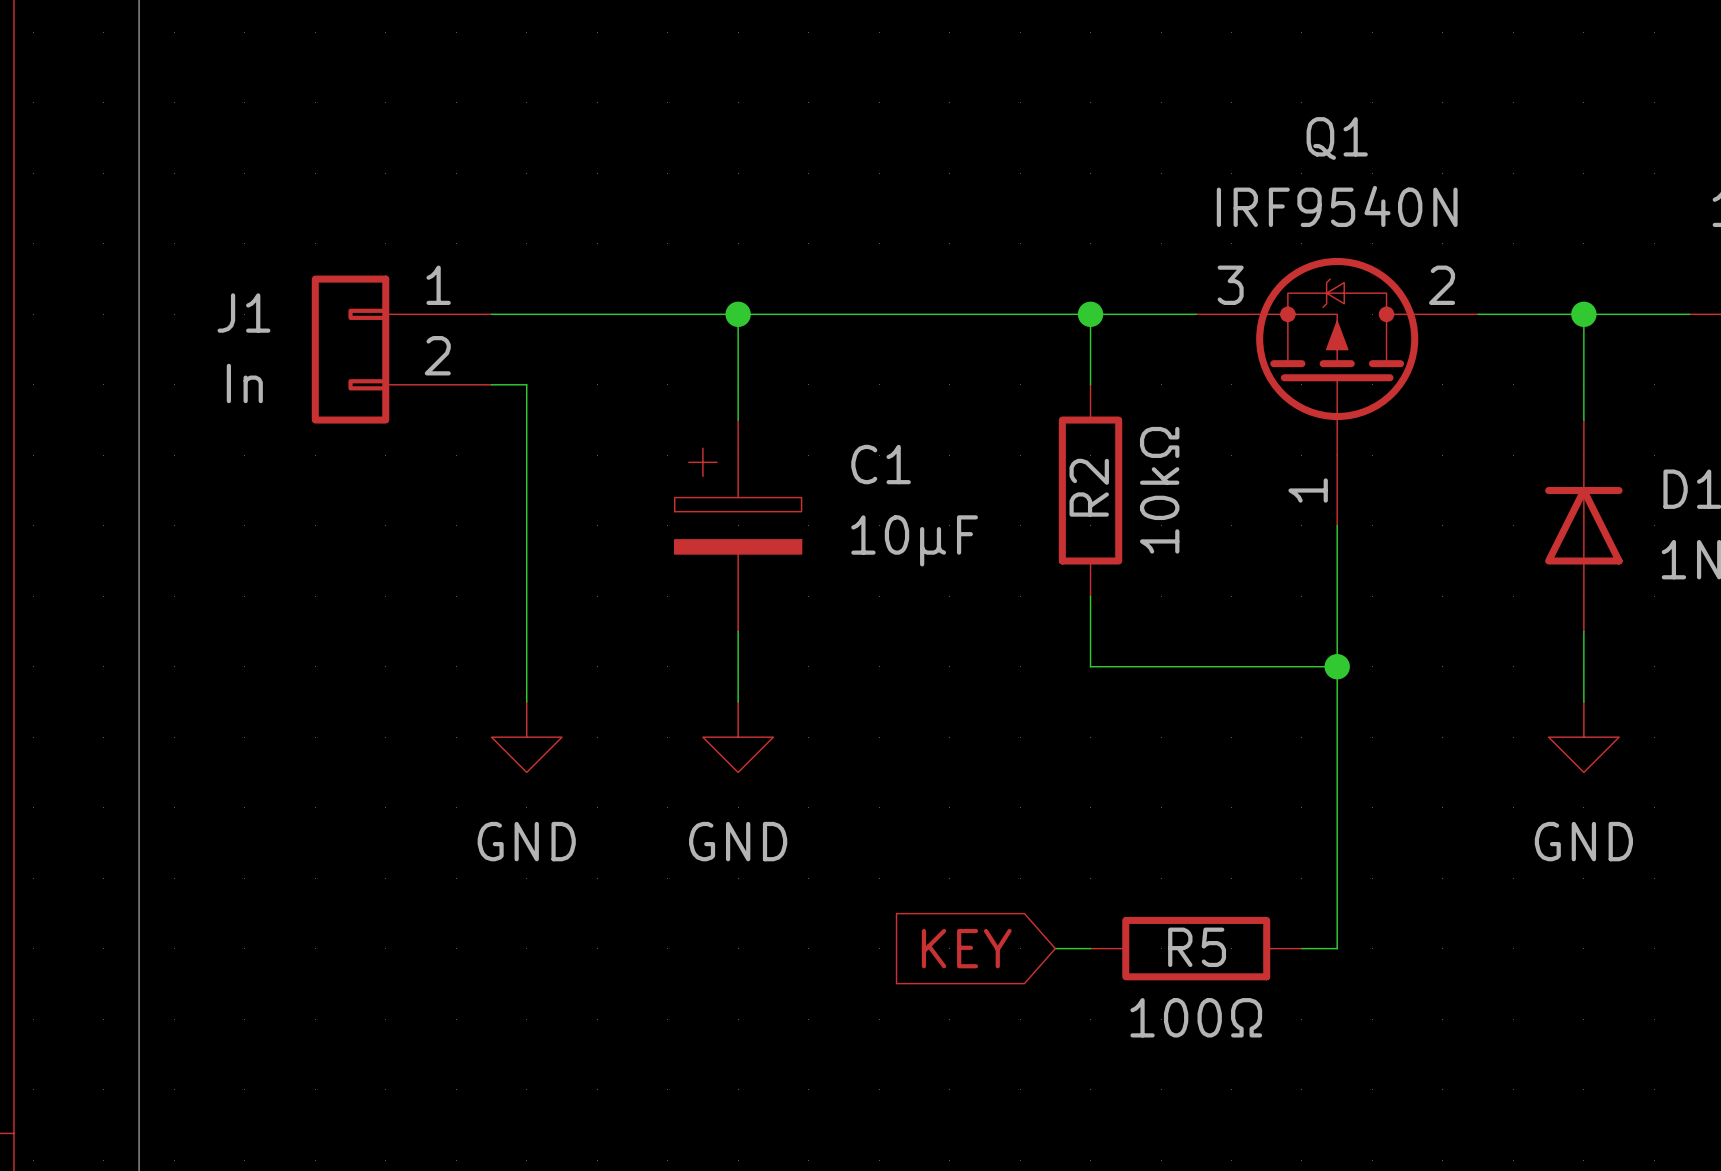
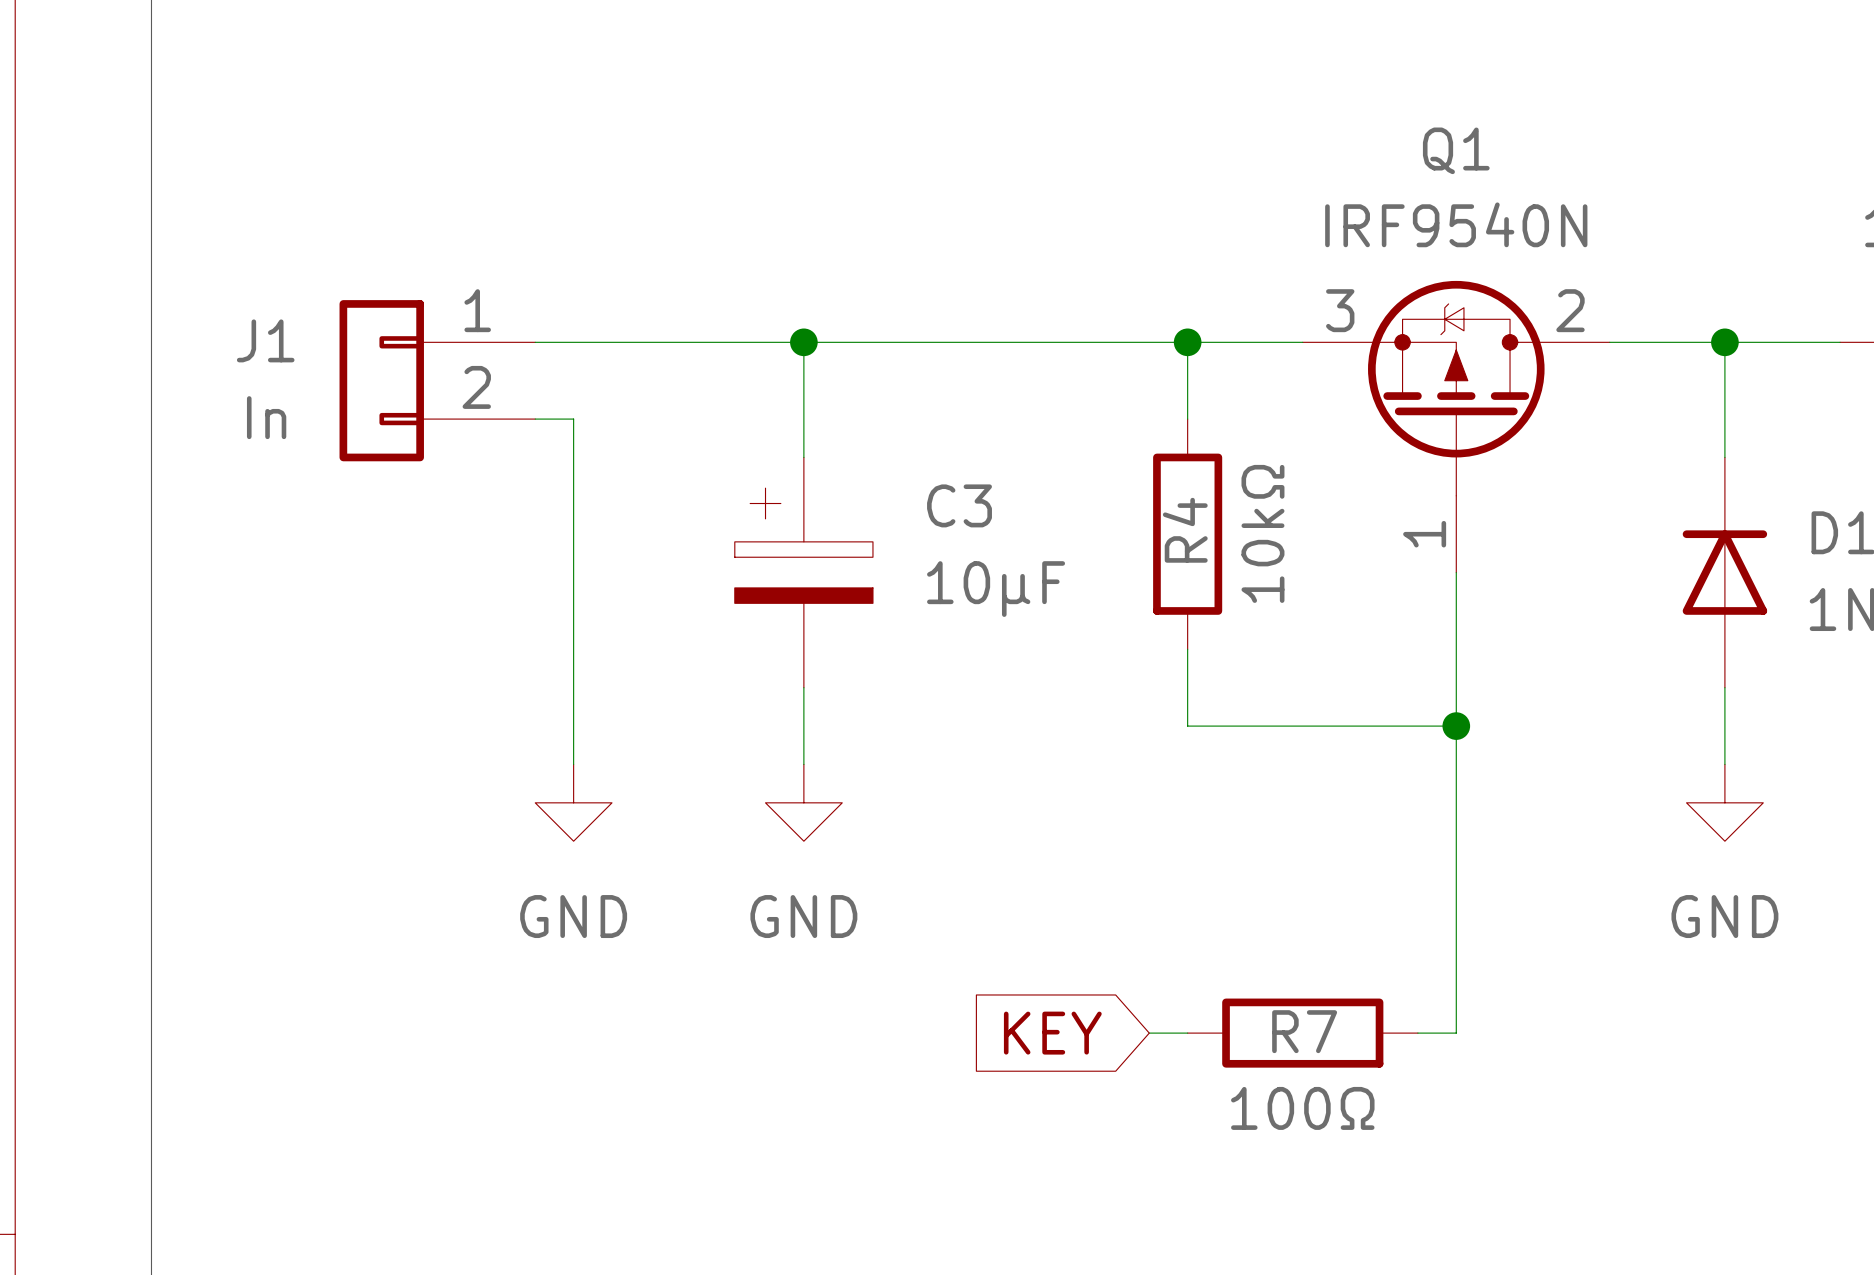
C1 name: C1 (881, 464) -> C3 (959, 505)
R2 name: R2 (1089, 487) -> R4 (1185, 530)
R5 name: R5 (1197, 947) -> R7 (1304, 1031)

